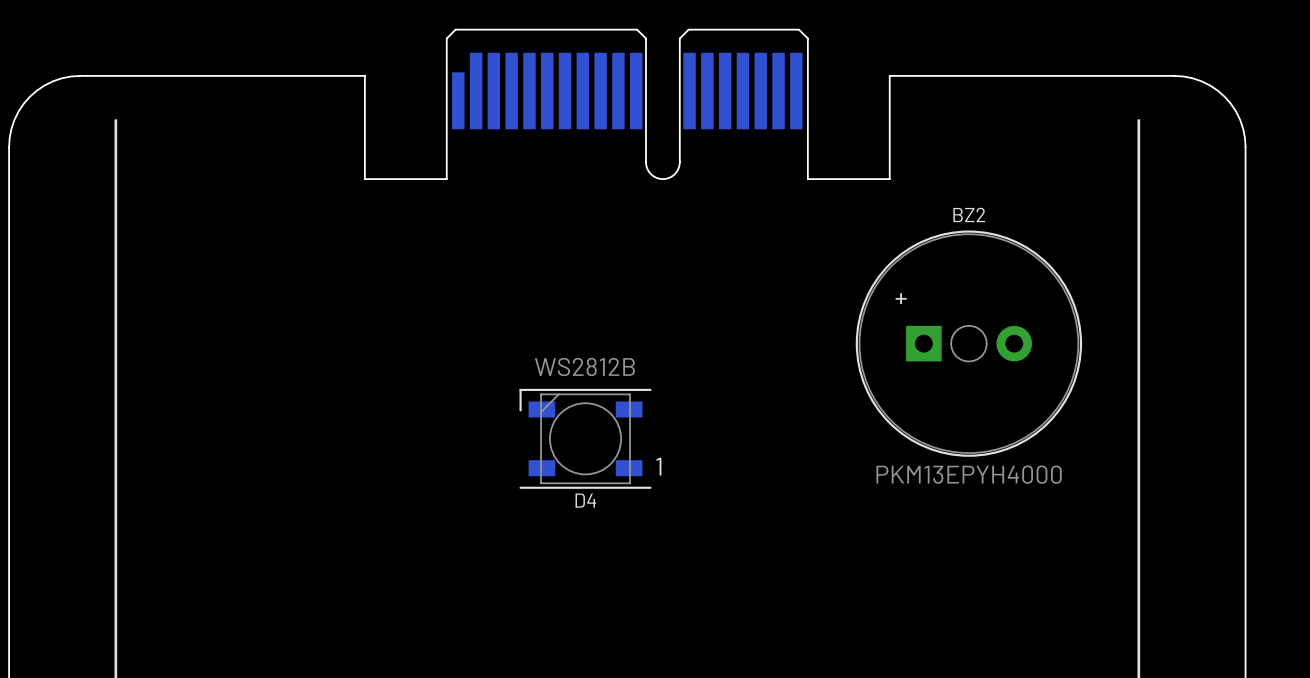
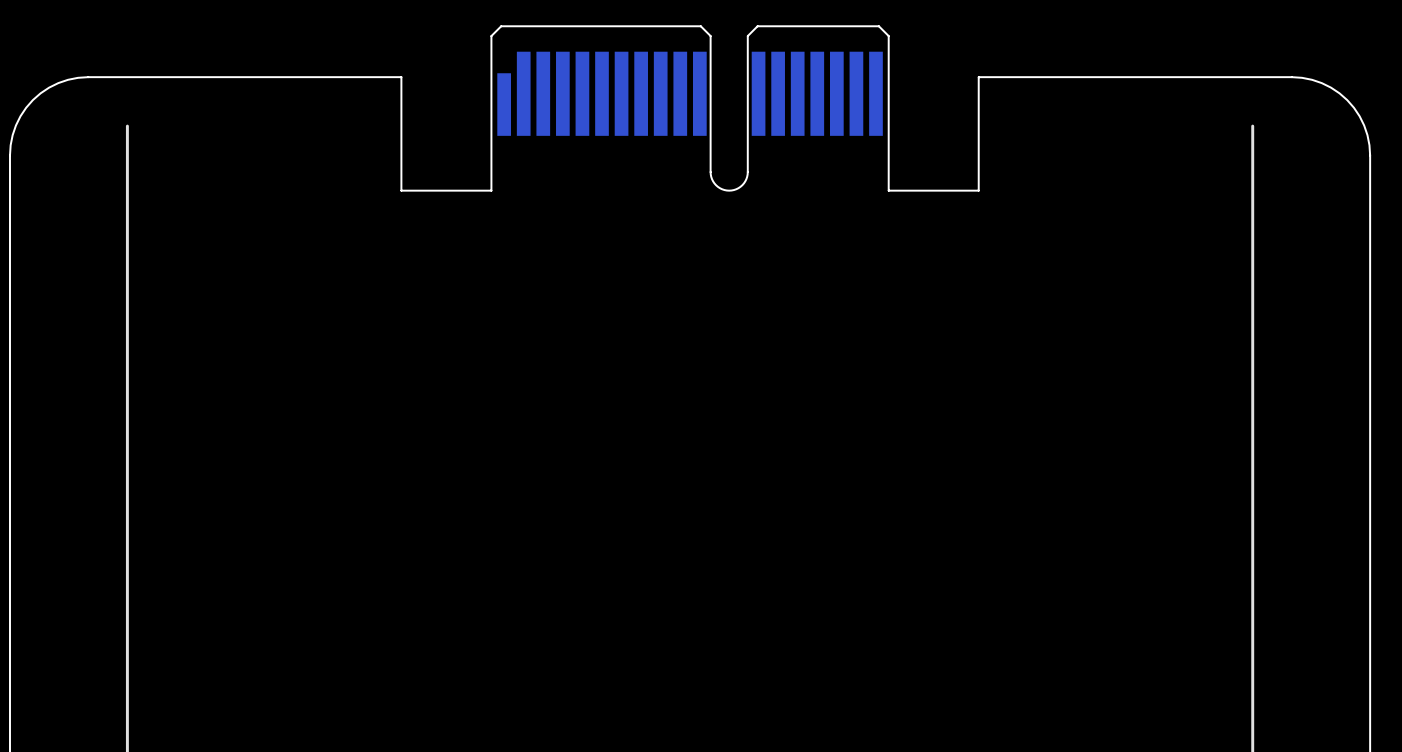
BZ2: PKM13EPYH4000 (968, 343) -> none
D4: WS2812B (585, 438) -> none

